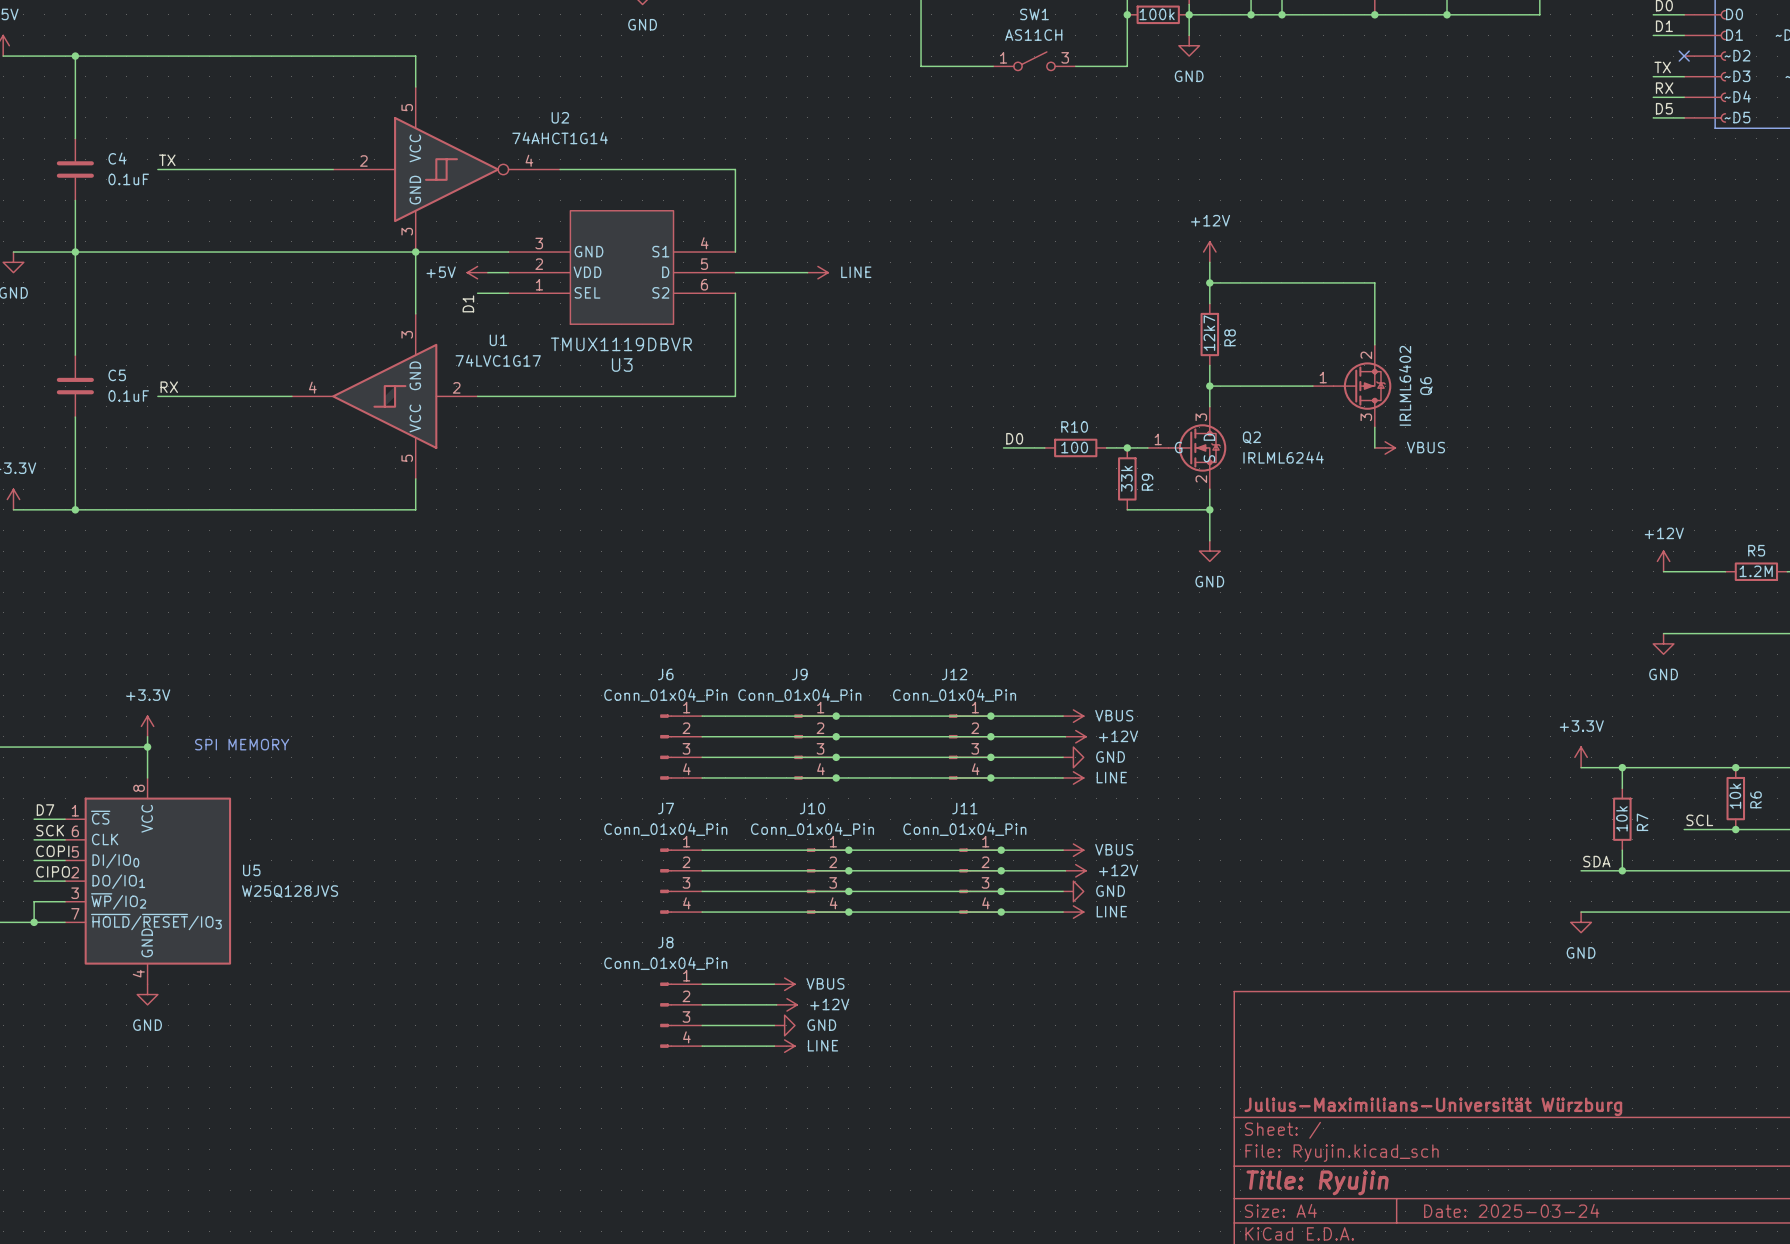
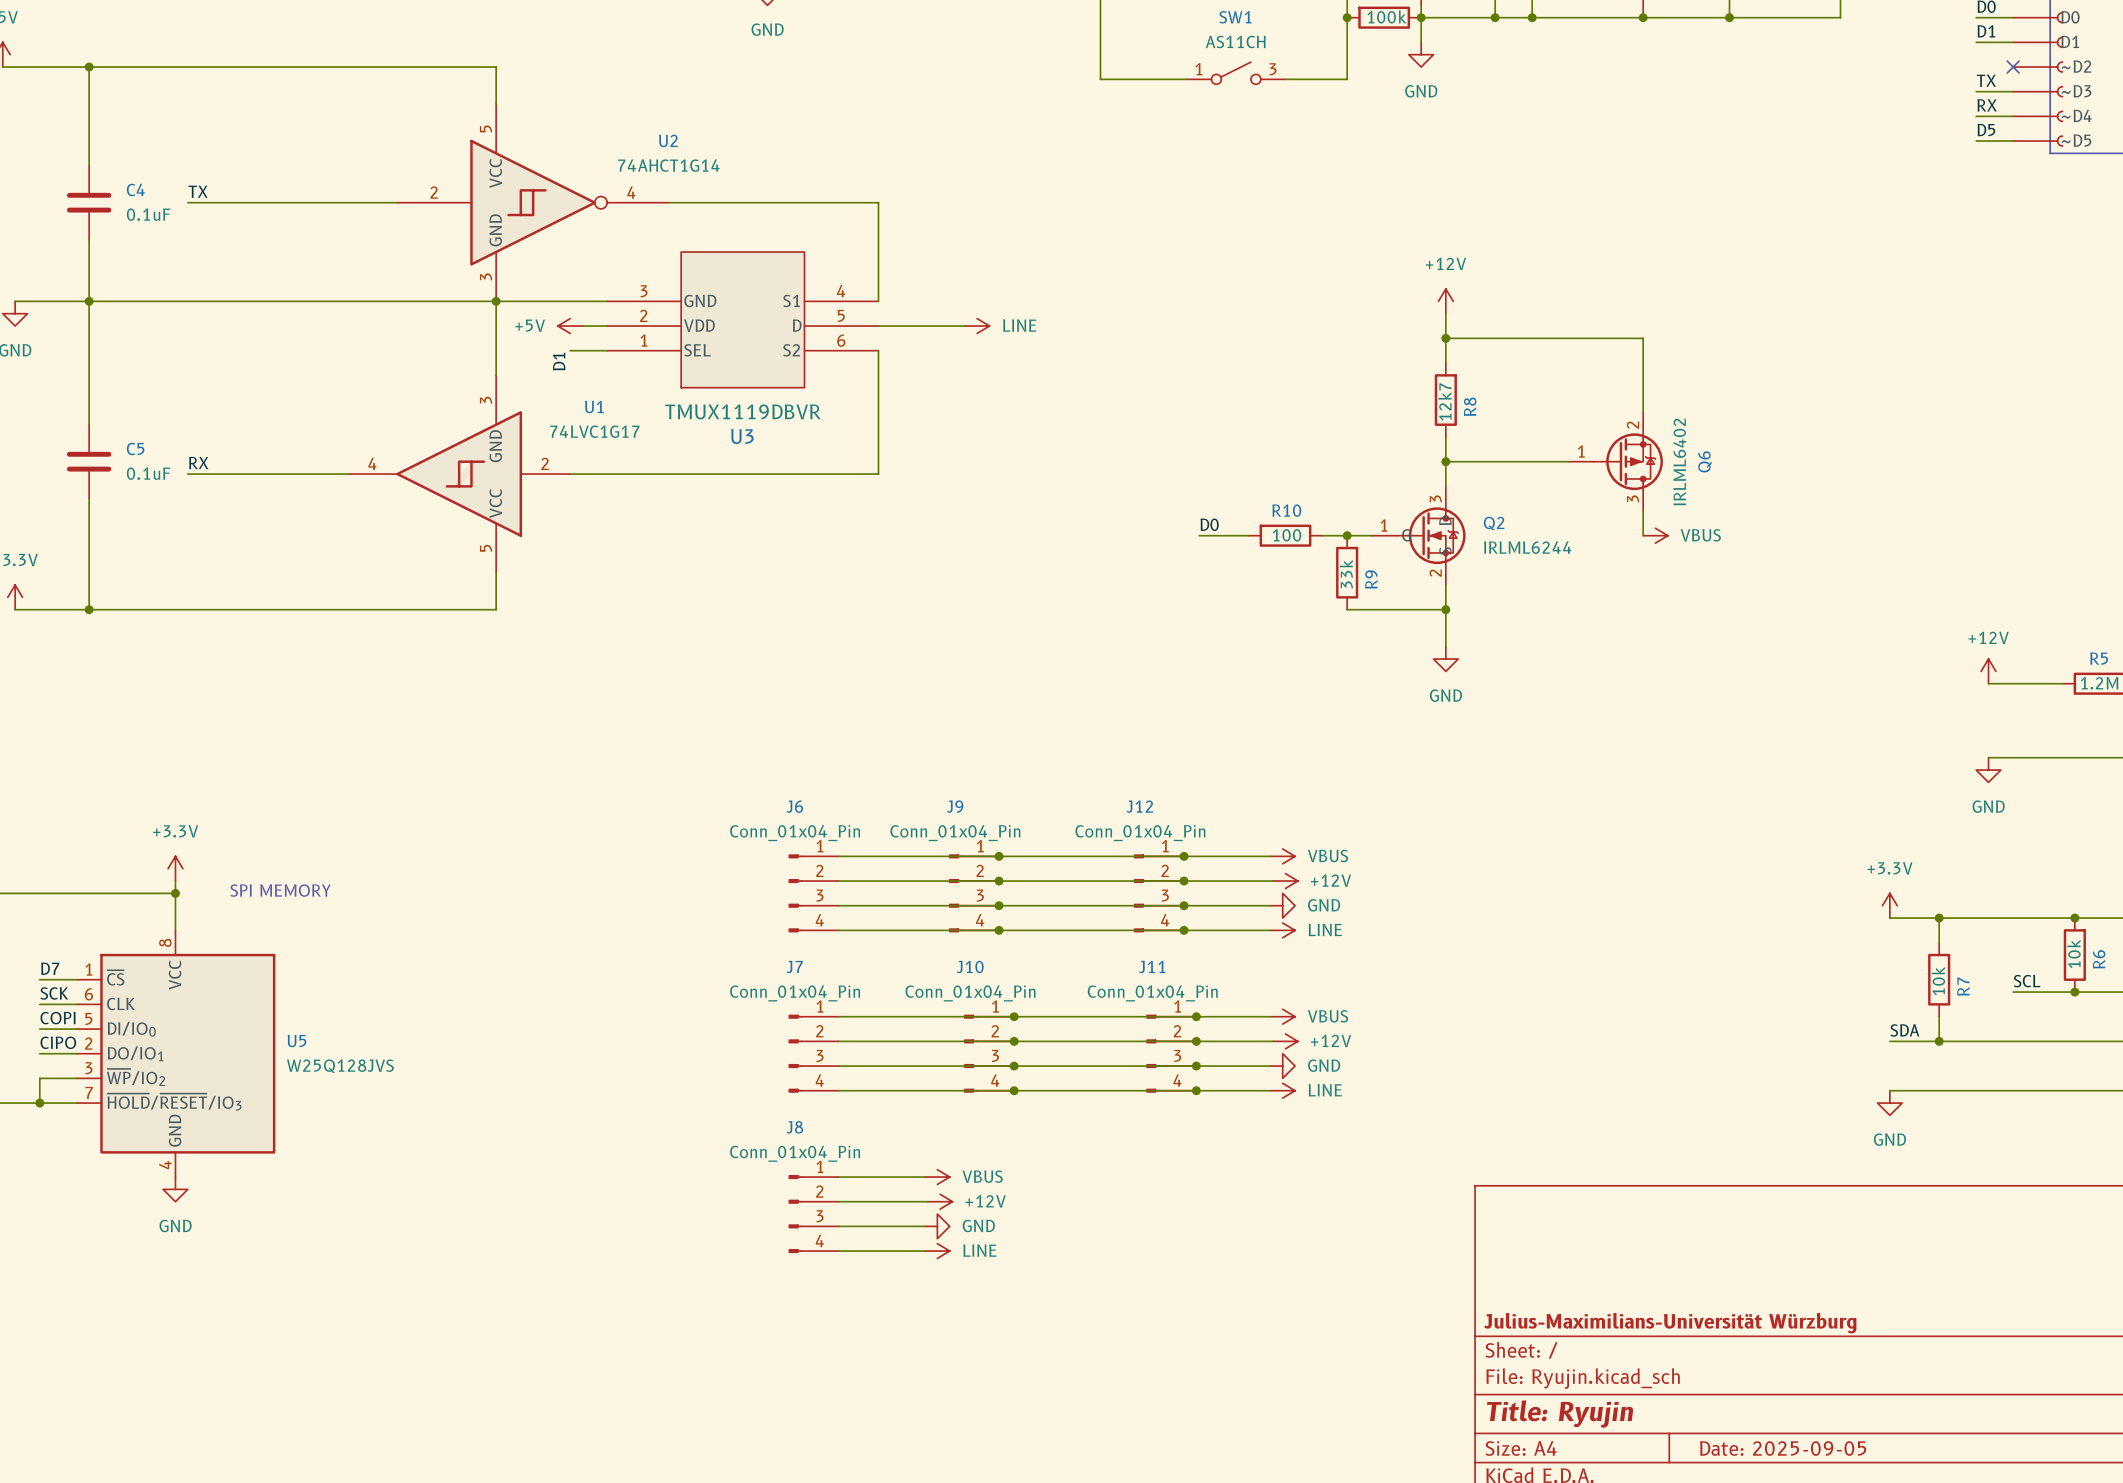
title block: Date: 2025-03-24 (1511, 1210) -> Date: 2025-09-05 (1783, 1448)

